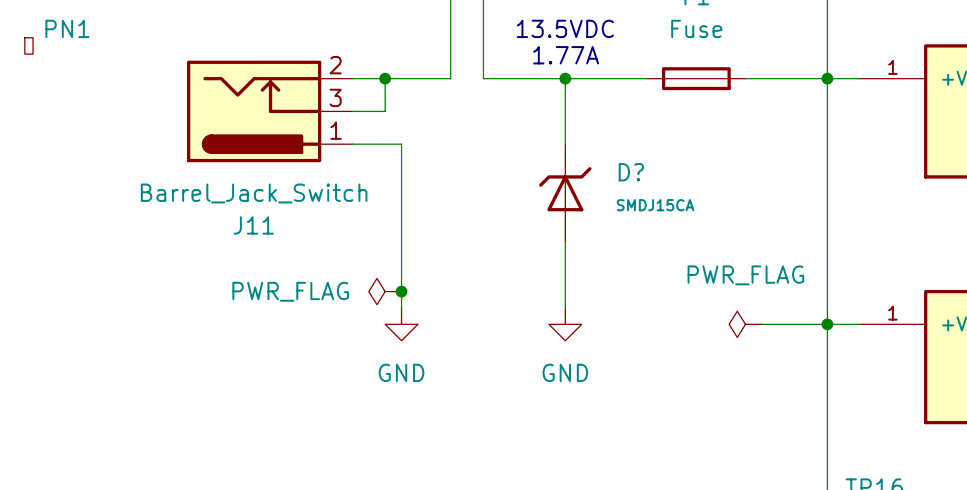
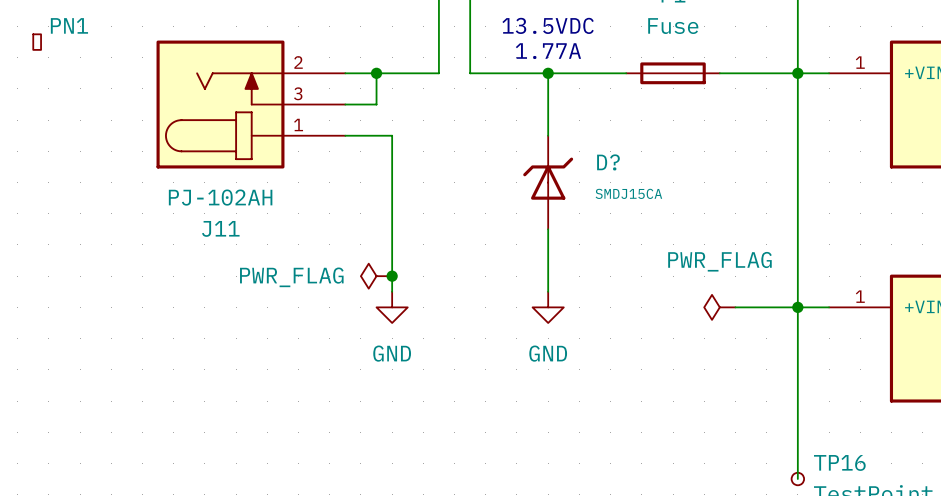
J11 symbol: [186, 60, 353, 163] -> [156, 40, 346, 169]
J11 value: Barrel_Jack_Switch (254, 193) -> PJ-102AH (220, 197)

